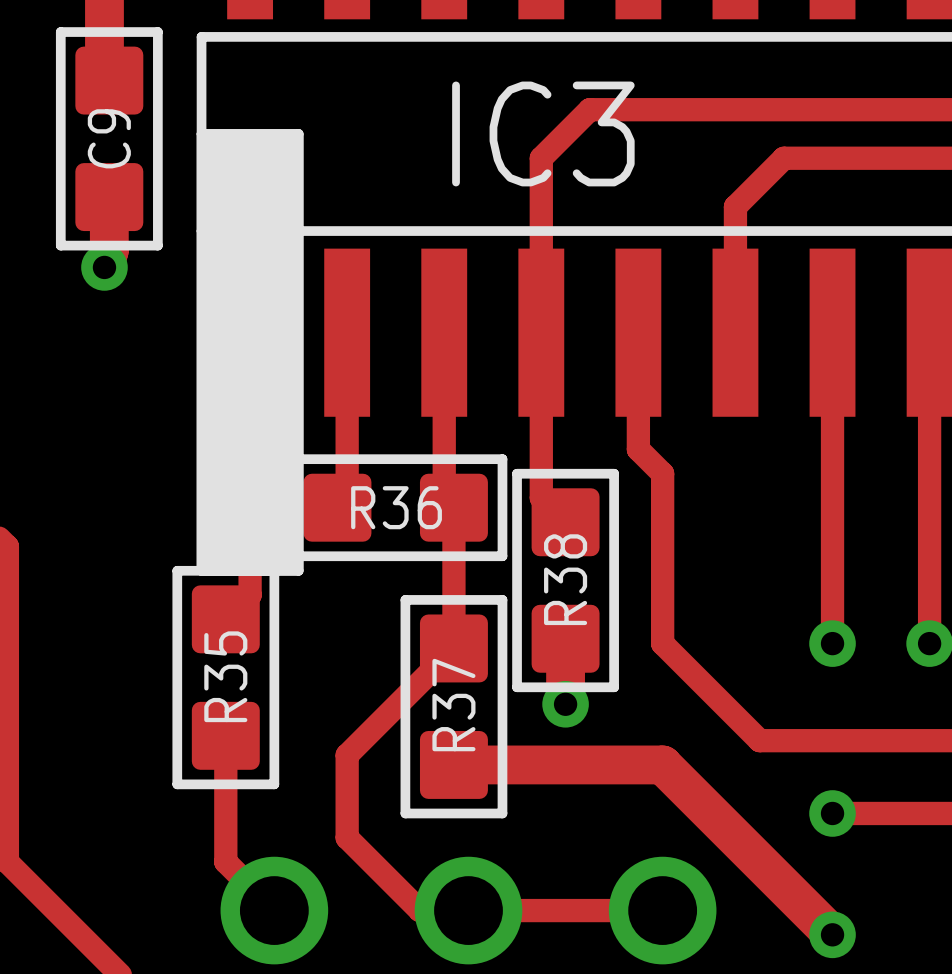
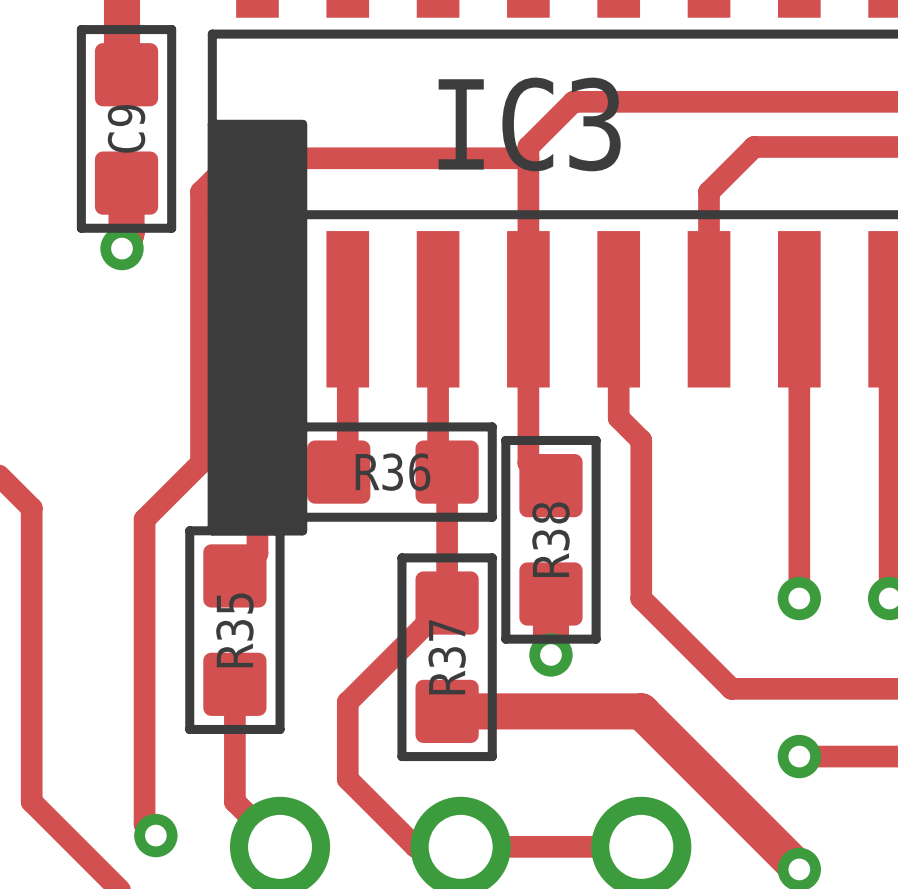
track: none -> (528, 158) (234, 158) (201, 192) (201, 463) (144, 519) (144, 824) (155, 835)
via: none -> (155, 835)

